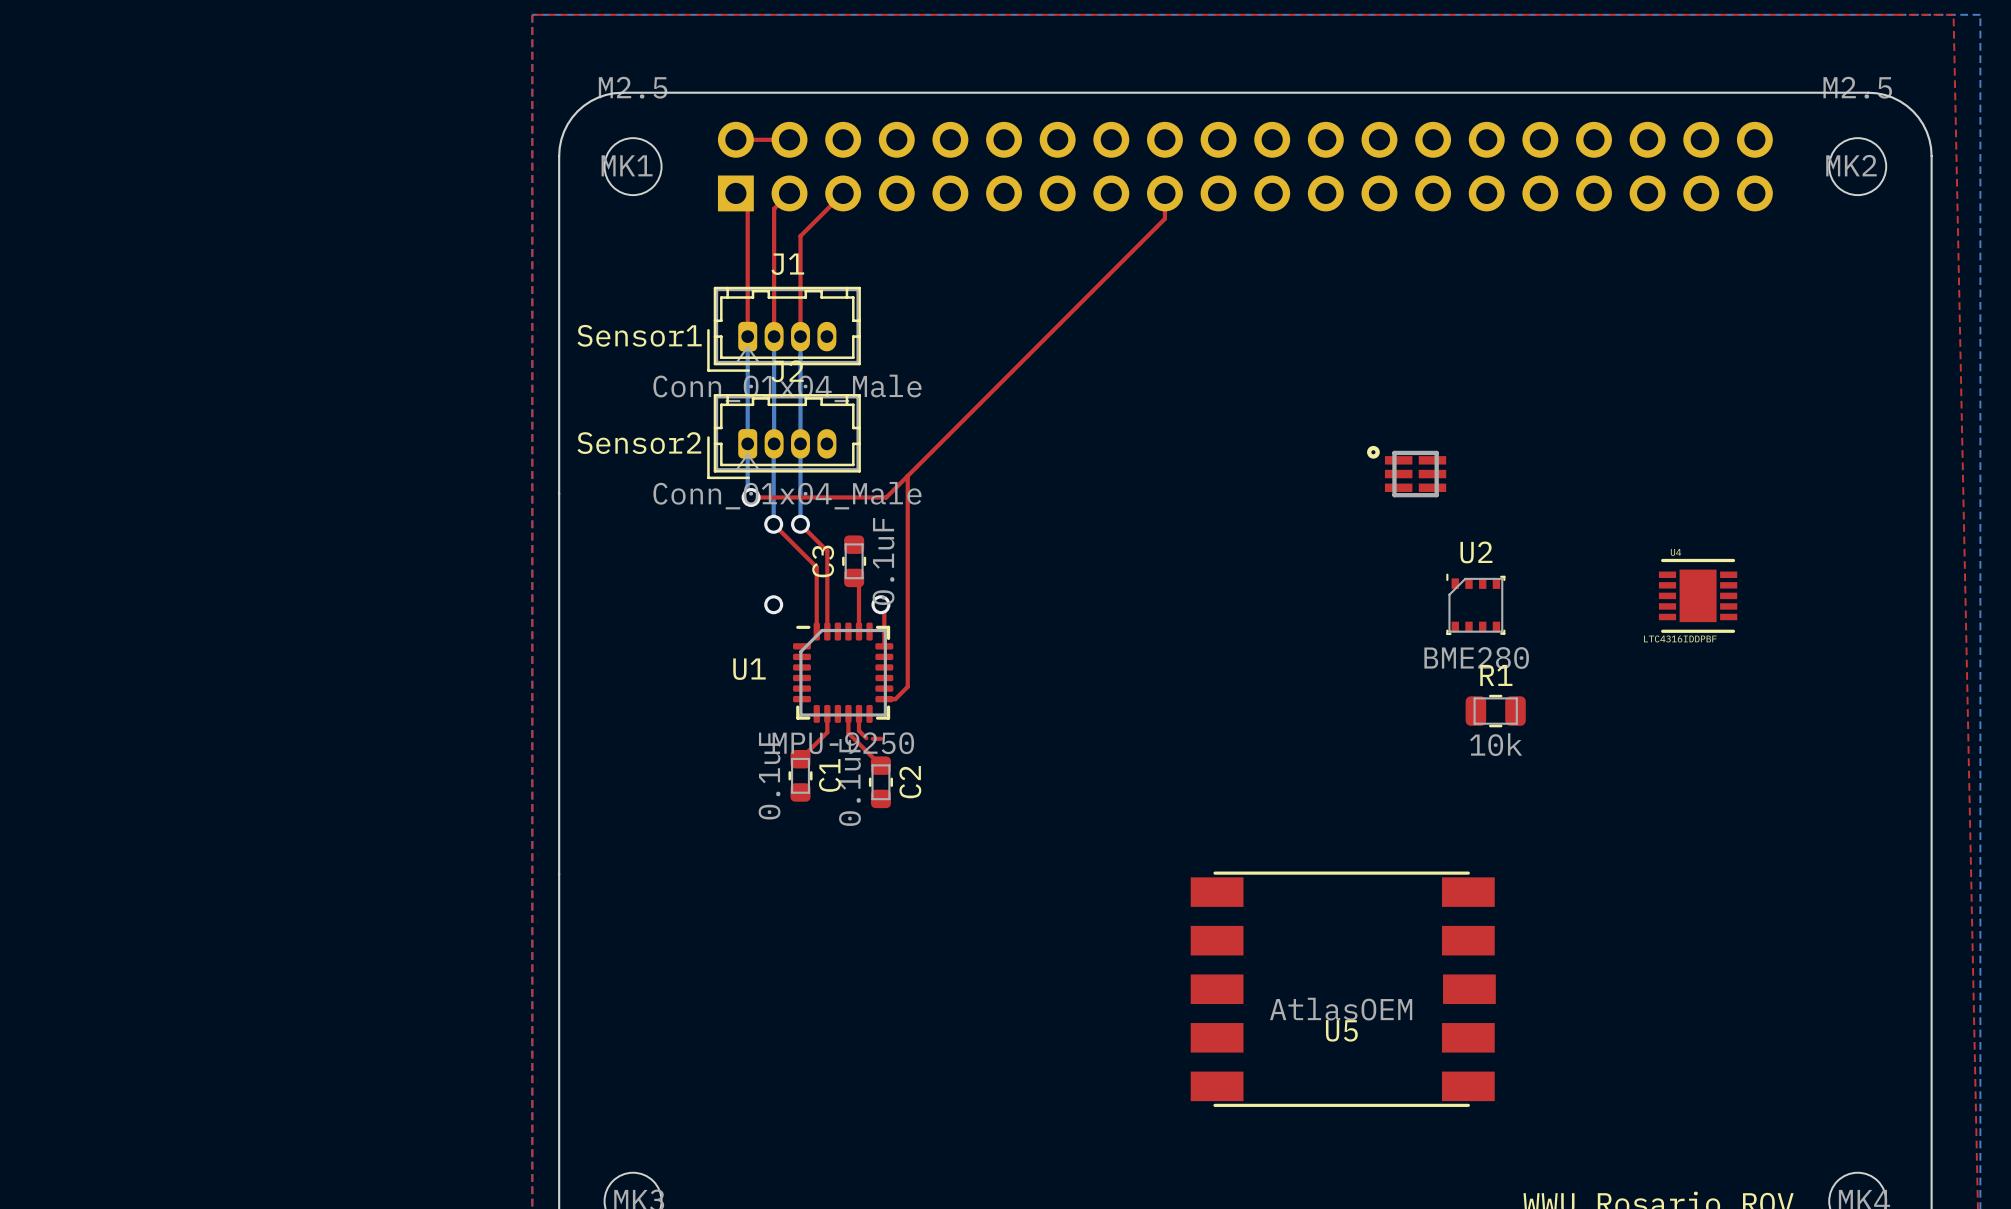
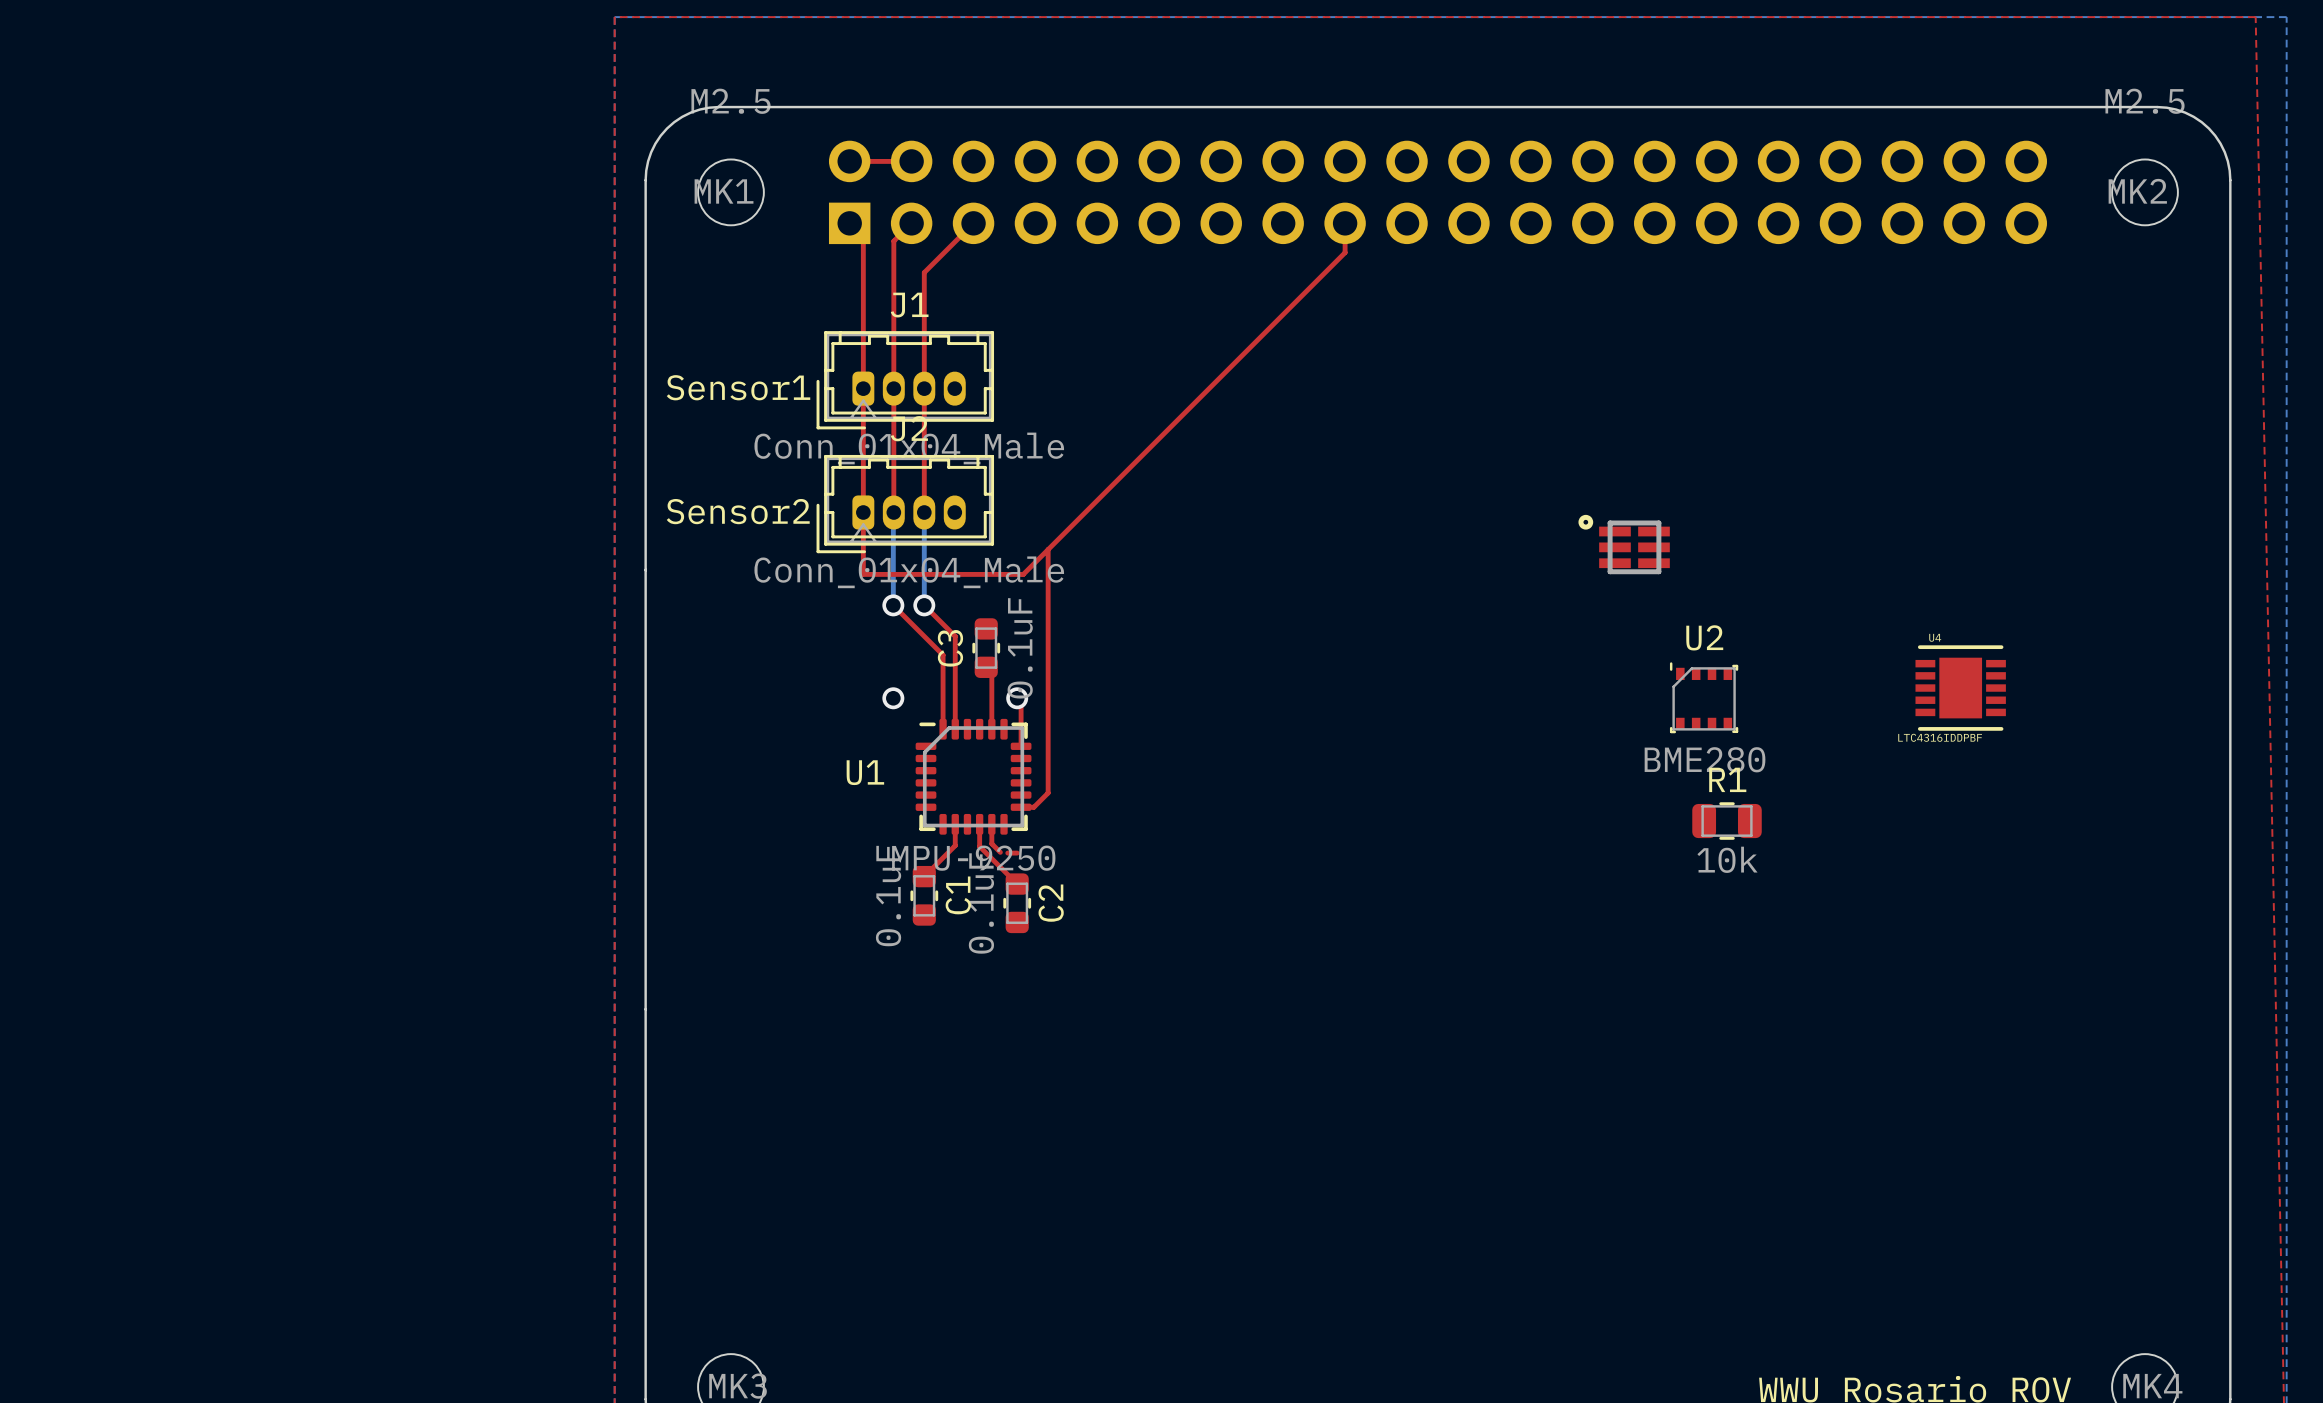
top track: none -> (863, 388) (863, 573)
bottom track: (747, 336) (747, 494) (751, 497) -> none
top track: none -> (893, 388) (893, 512)
bottom track: (774, 336) (774, 443) -> none
top track: none -> (924, 388) (924, 512)
bottom track: (800, 336) (800, 443) -> none
via: (751, 497) -> none
U5: AtlasOEM (1343, 989) -> none

